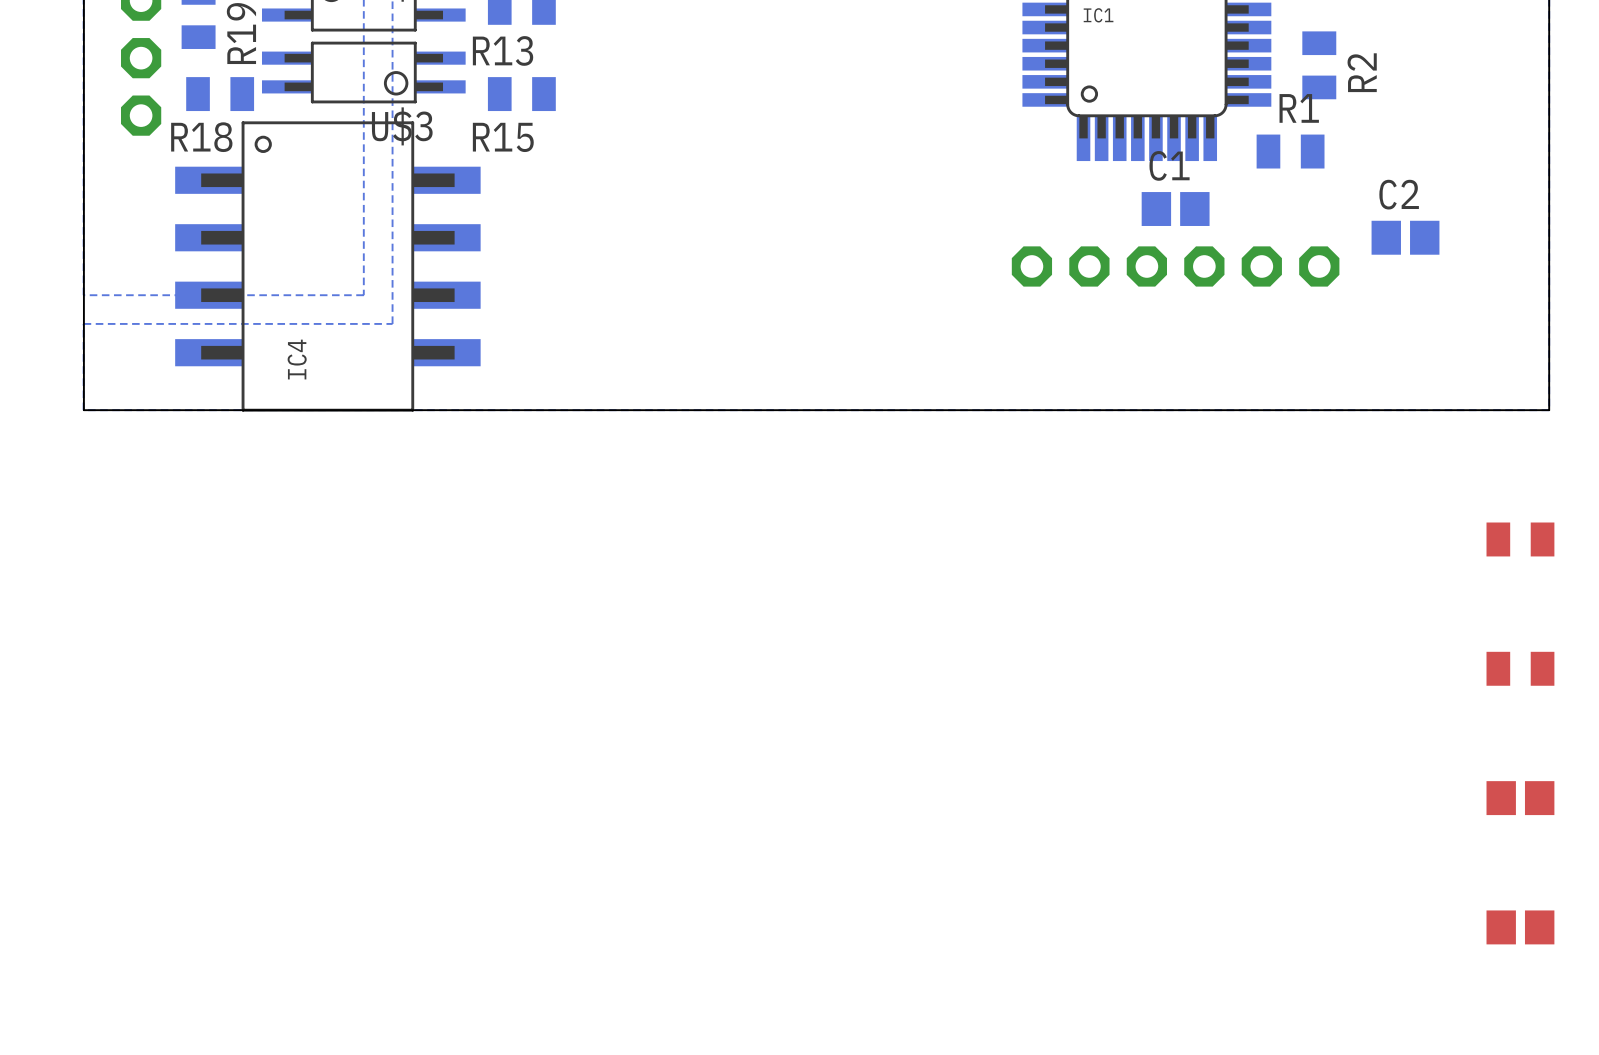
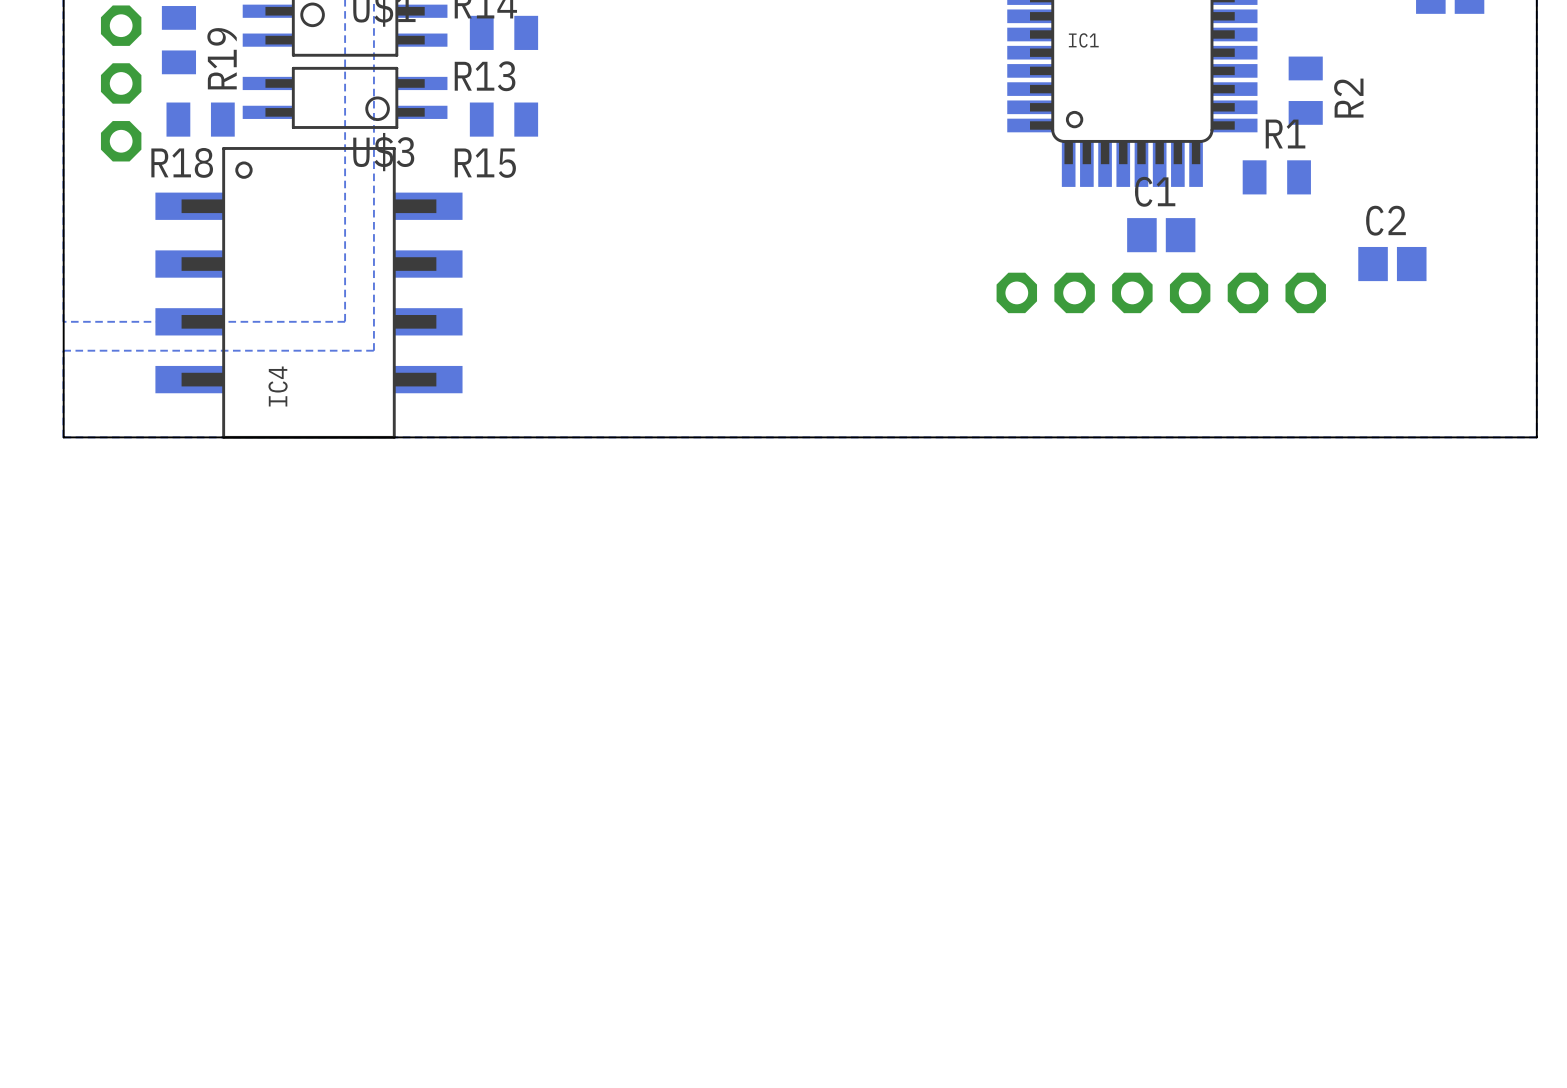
part: (1520, 539) -> none
part: (1520, 668) -> none
part: (1520, 798) -> none
part: (1520, 927) -> none

